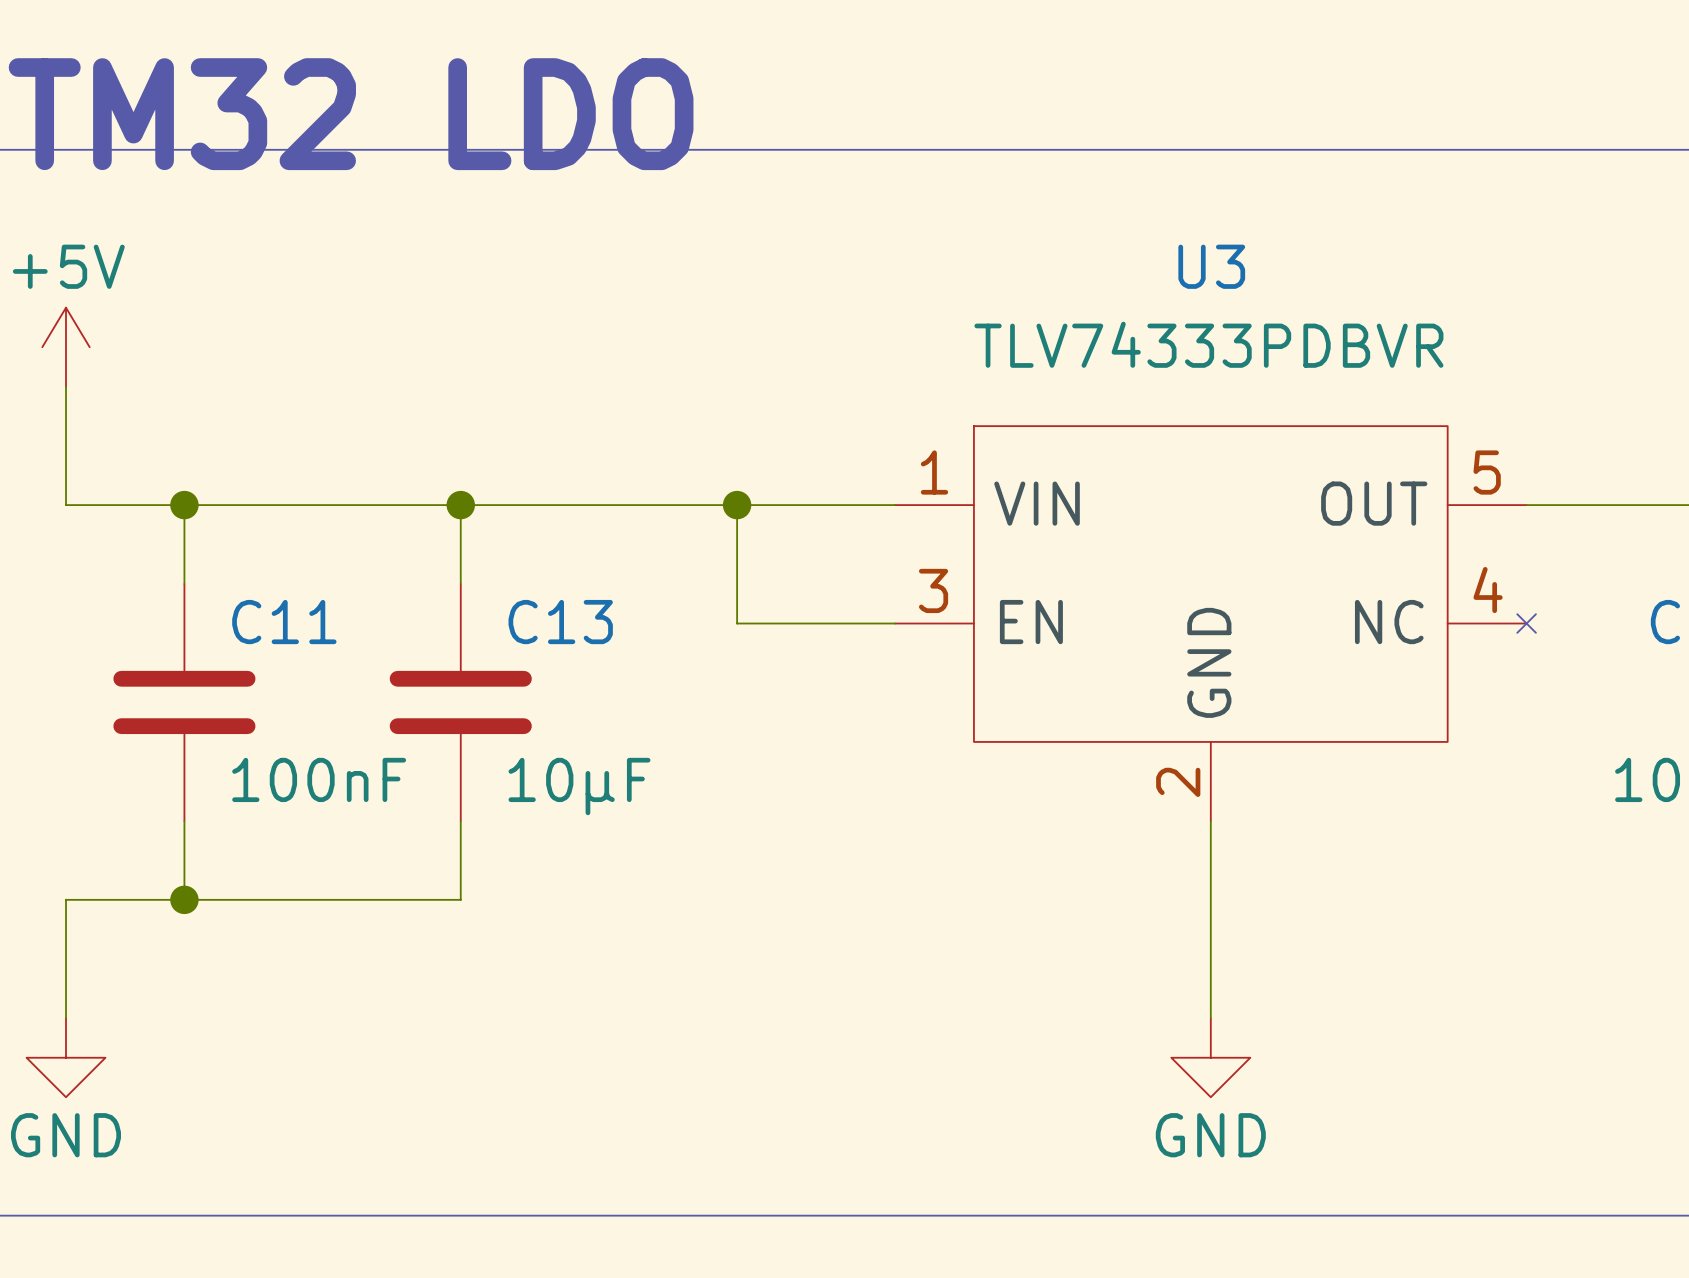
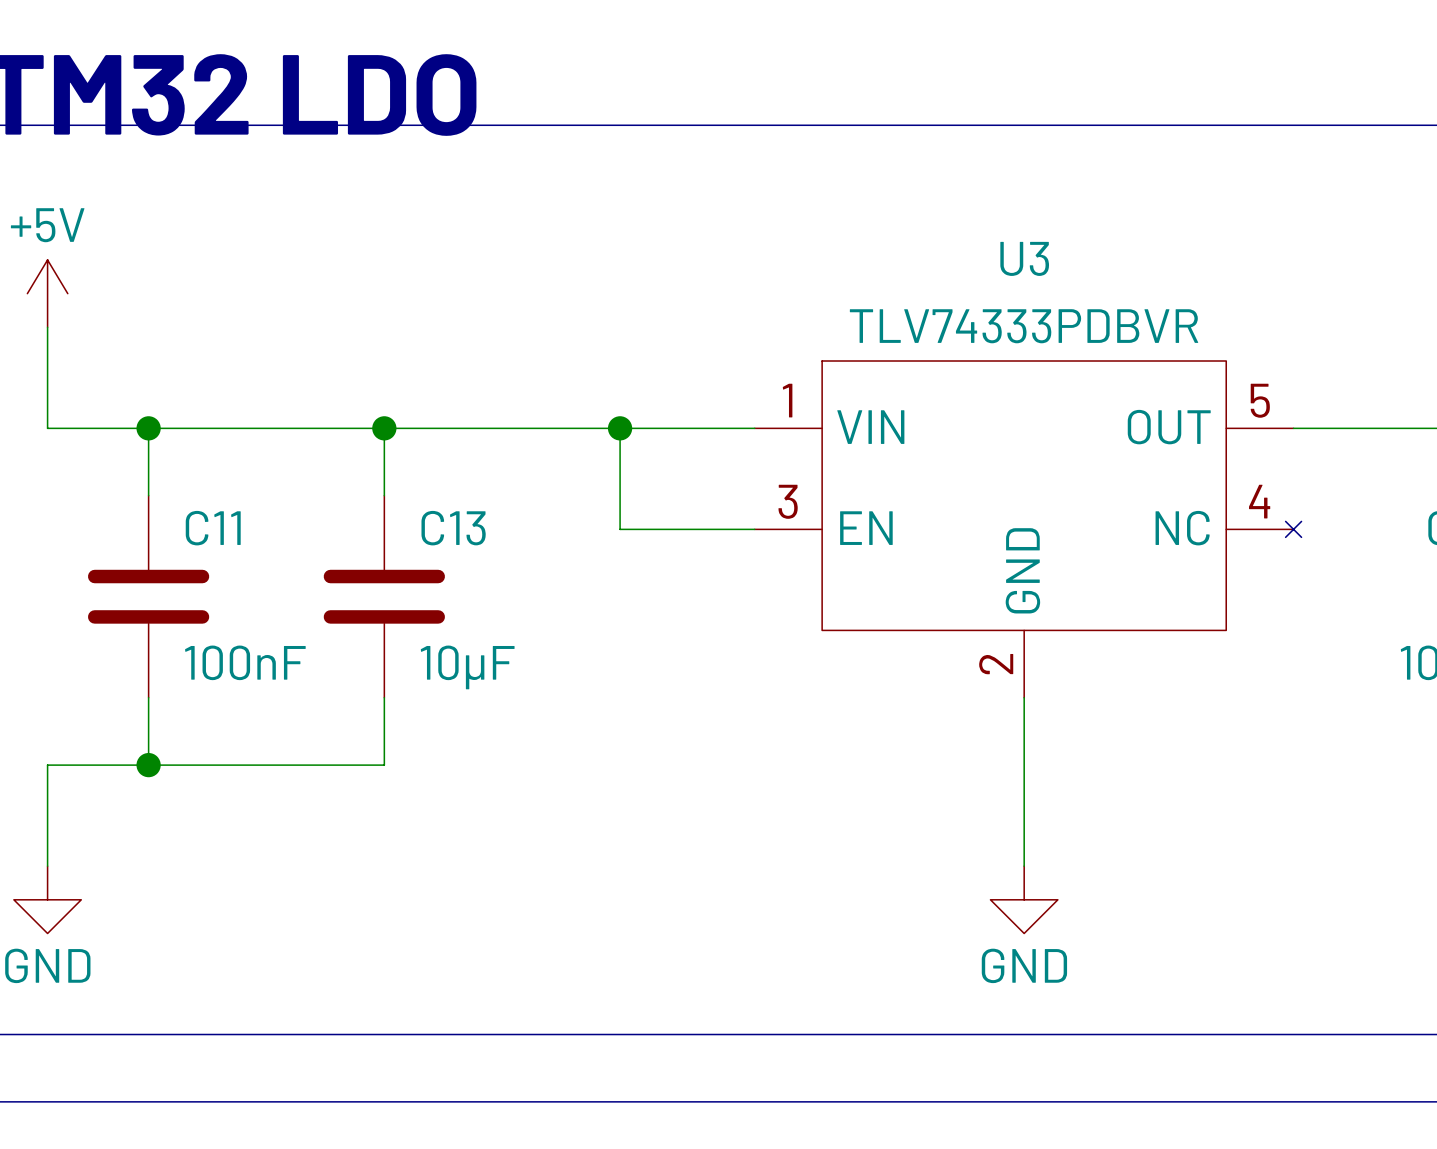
U3 name position: U3 (1211, 266) -> U3 (1024, 258)
U3 value position: TLV74333PDBVR (1208, 344) -> TLV74333PDBVR (1024, 326)

